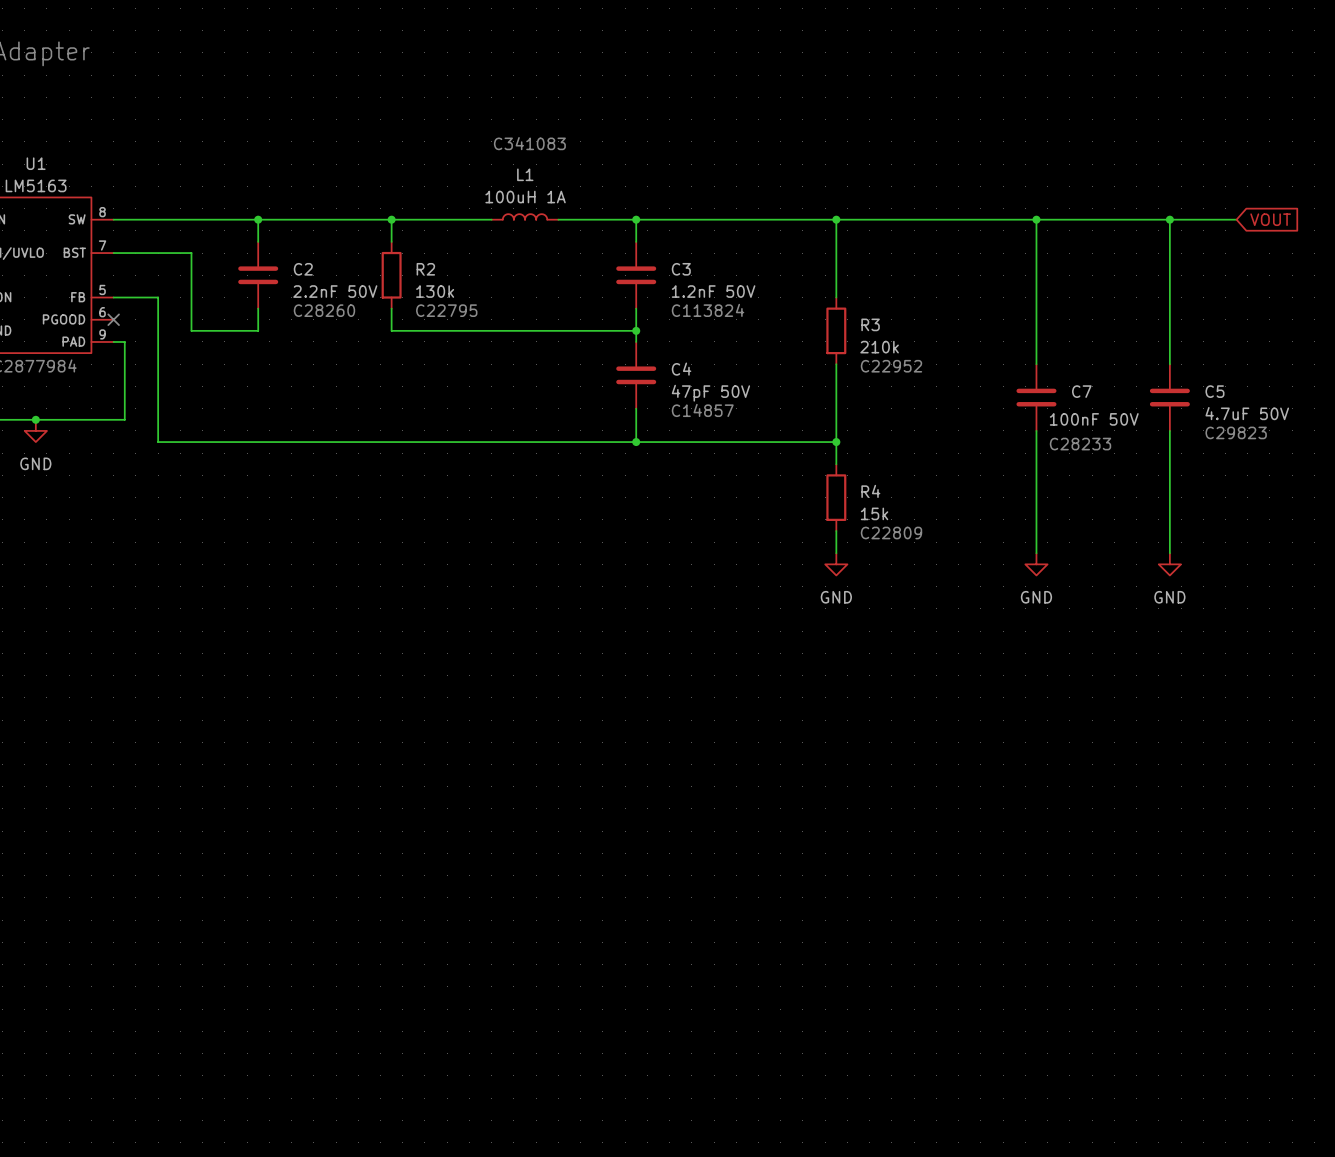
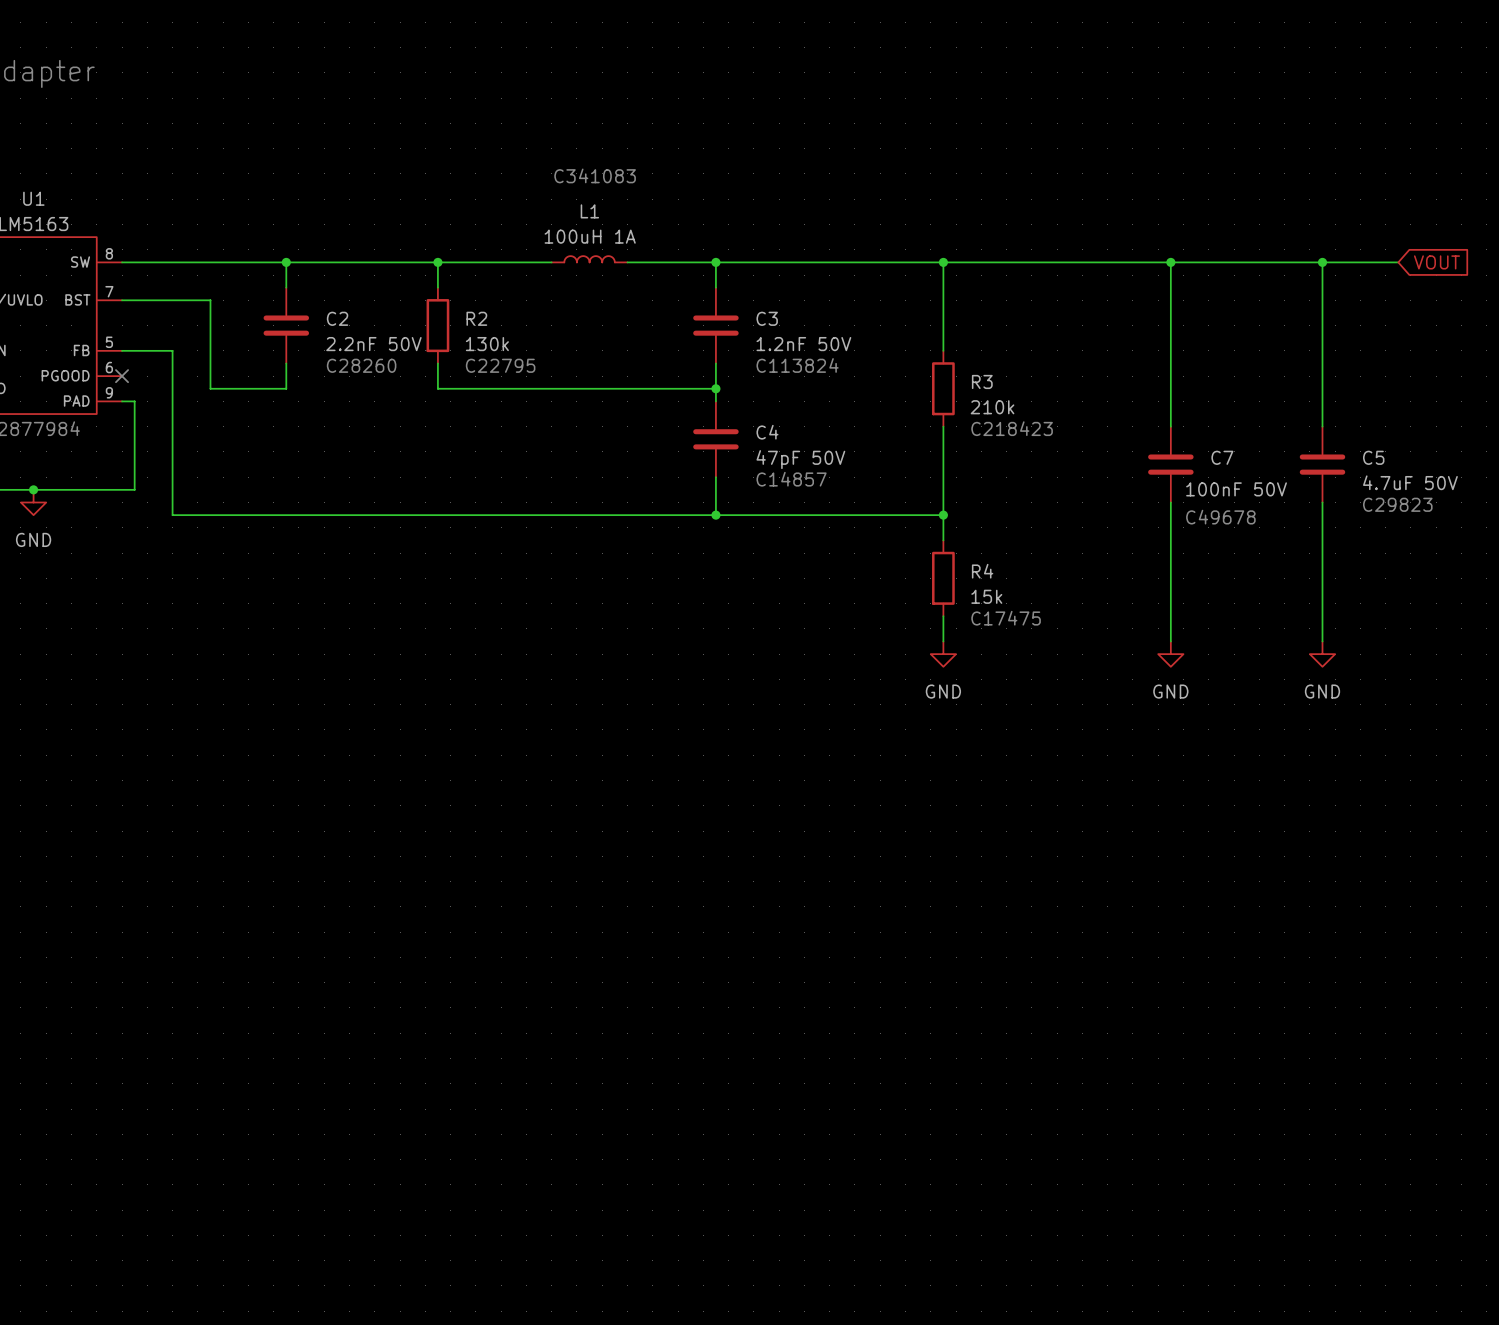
text: C22952 (891, 366) -> C218423 (1012, 428)
text: C28233 (1080, 444) -> C49678 (1220, 517)
text: C22809 (891, 533) -> C17475 (1006, 618)

